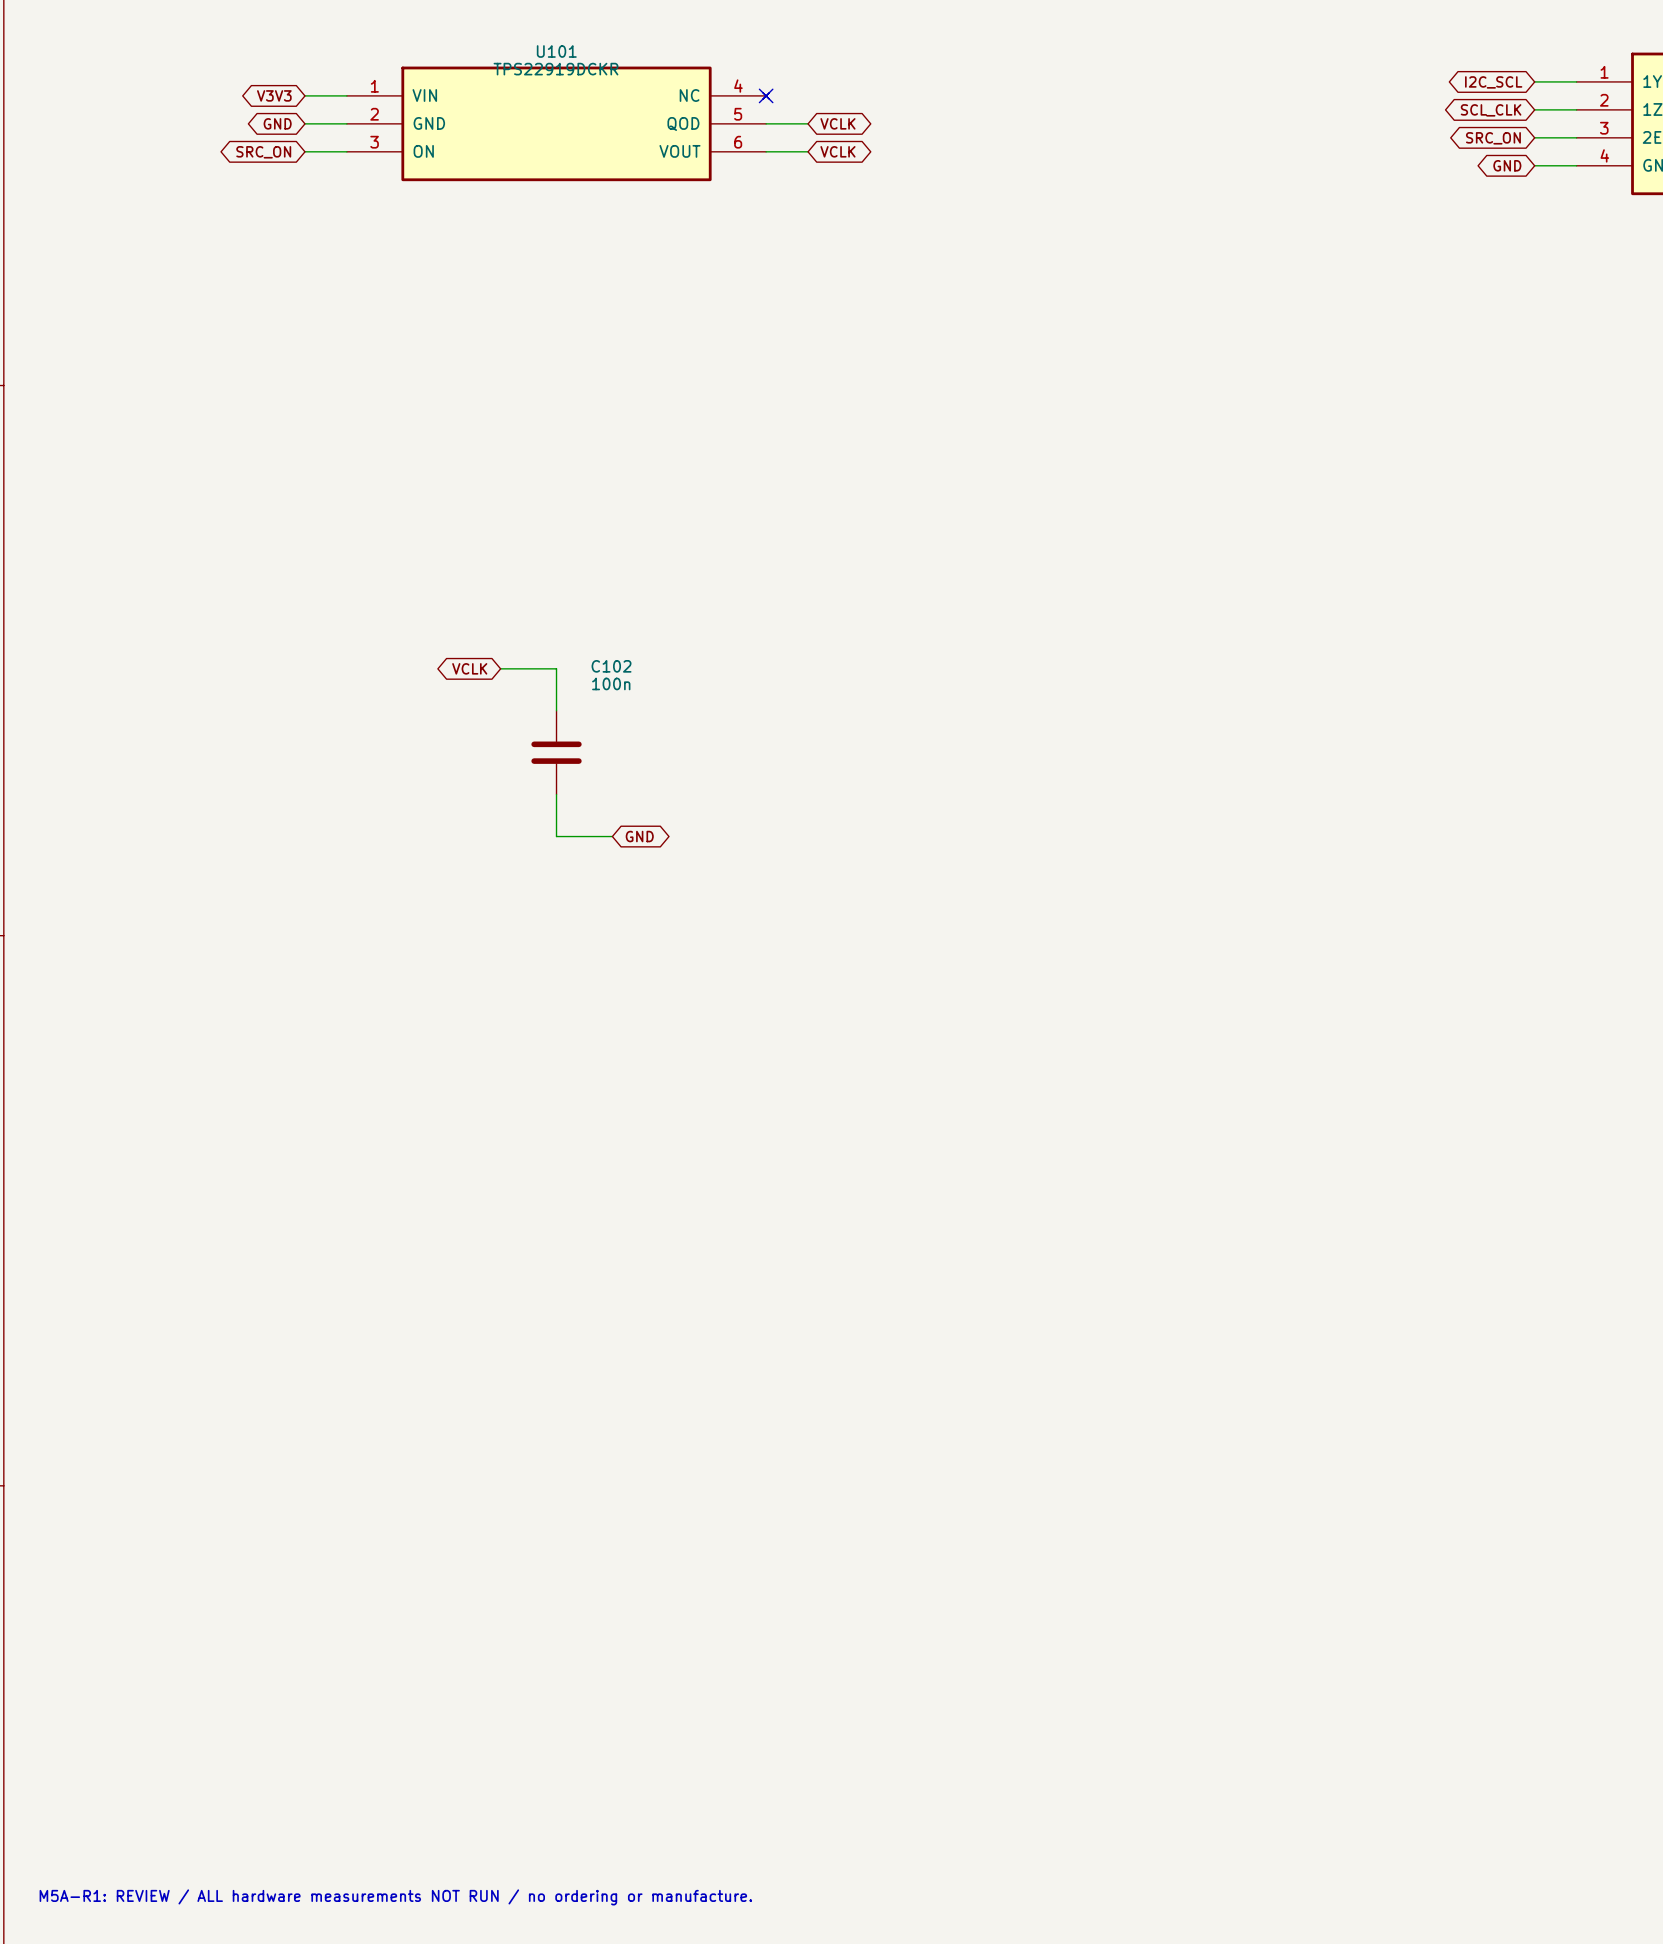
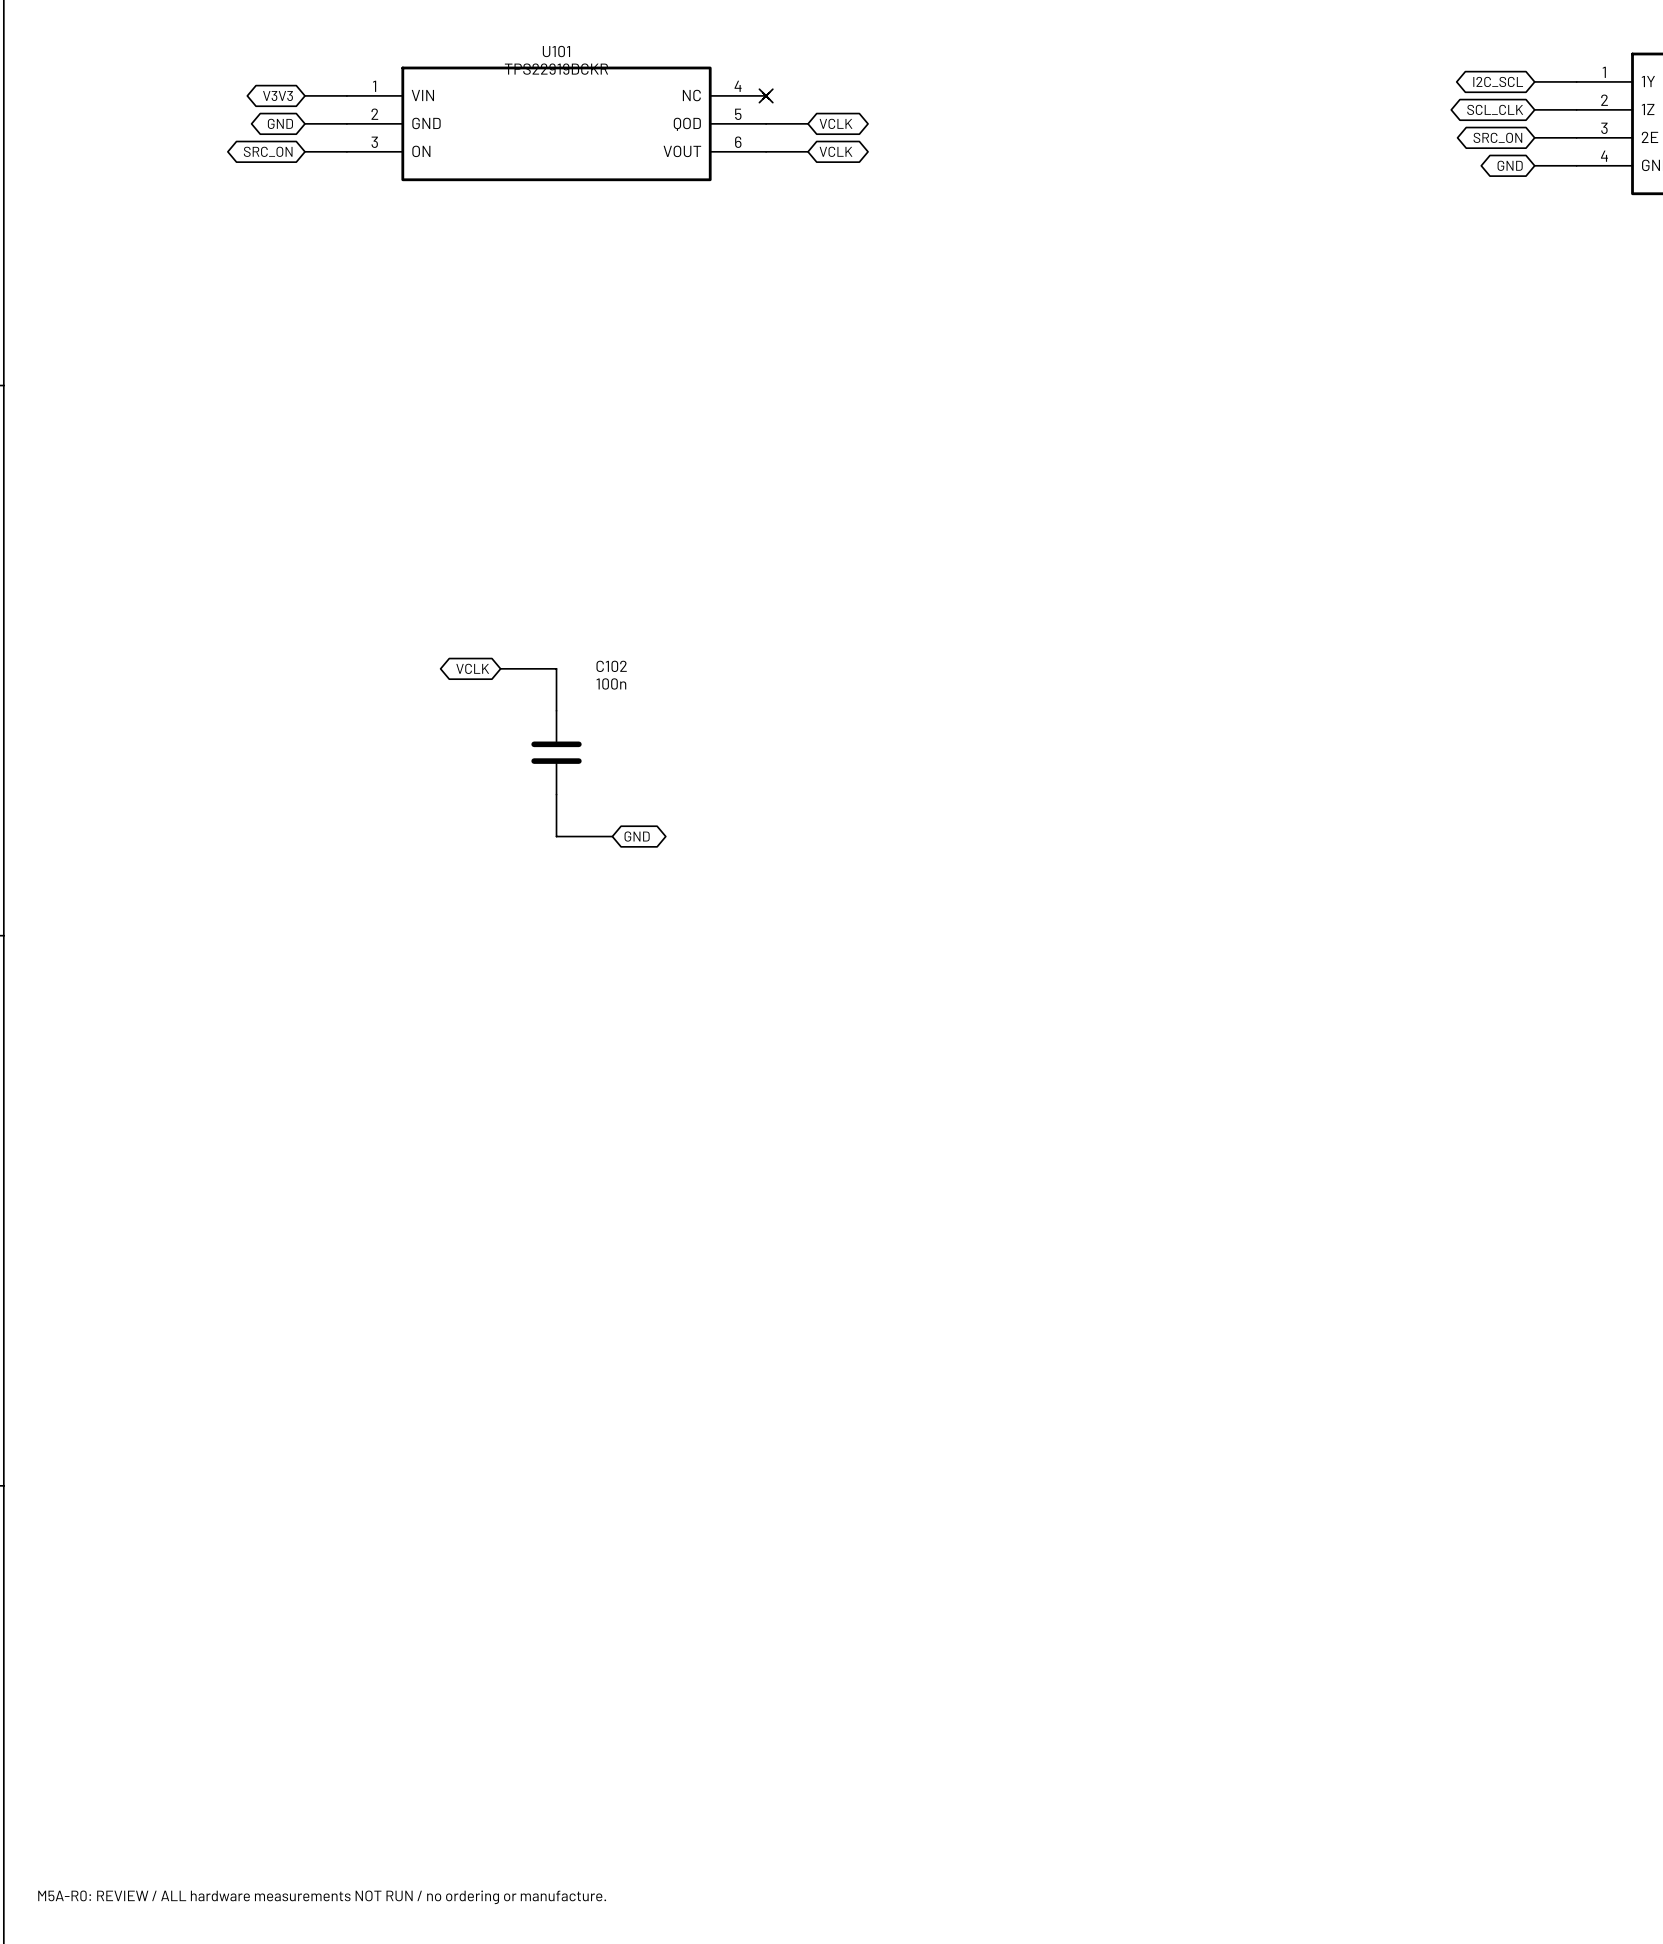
text: M5A-R1: REVIEW / ALL hardware measurements NOT RUN / no ordering or manufacture. (395, 1897) -> M5A-R0: REVIEW / ALL hardware measurements NOT RUN / no ordering or manufacture. (322, 1897)

